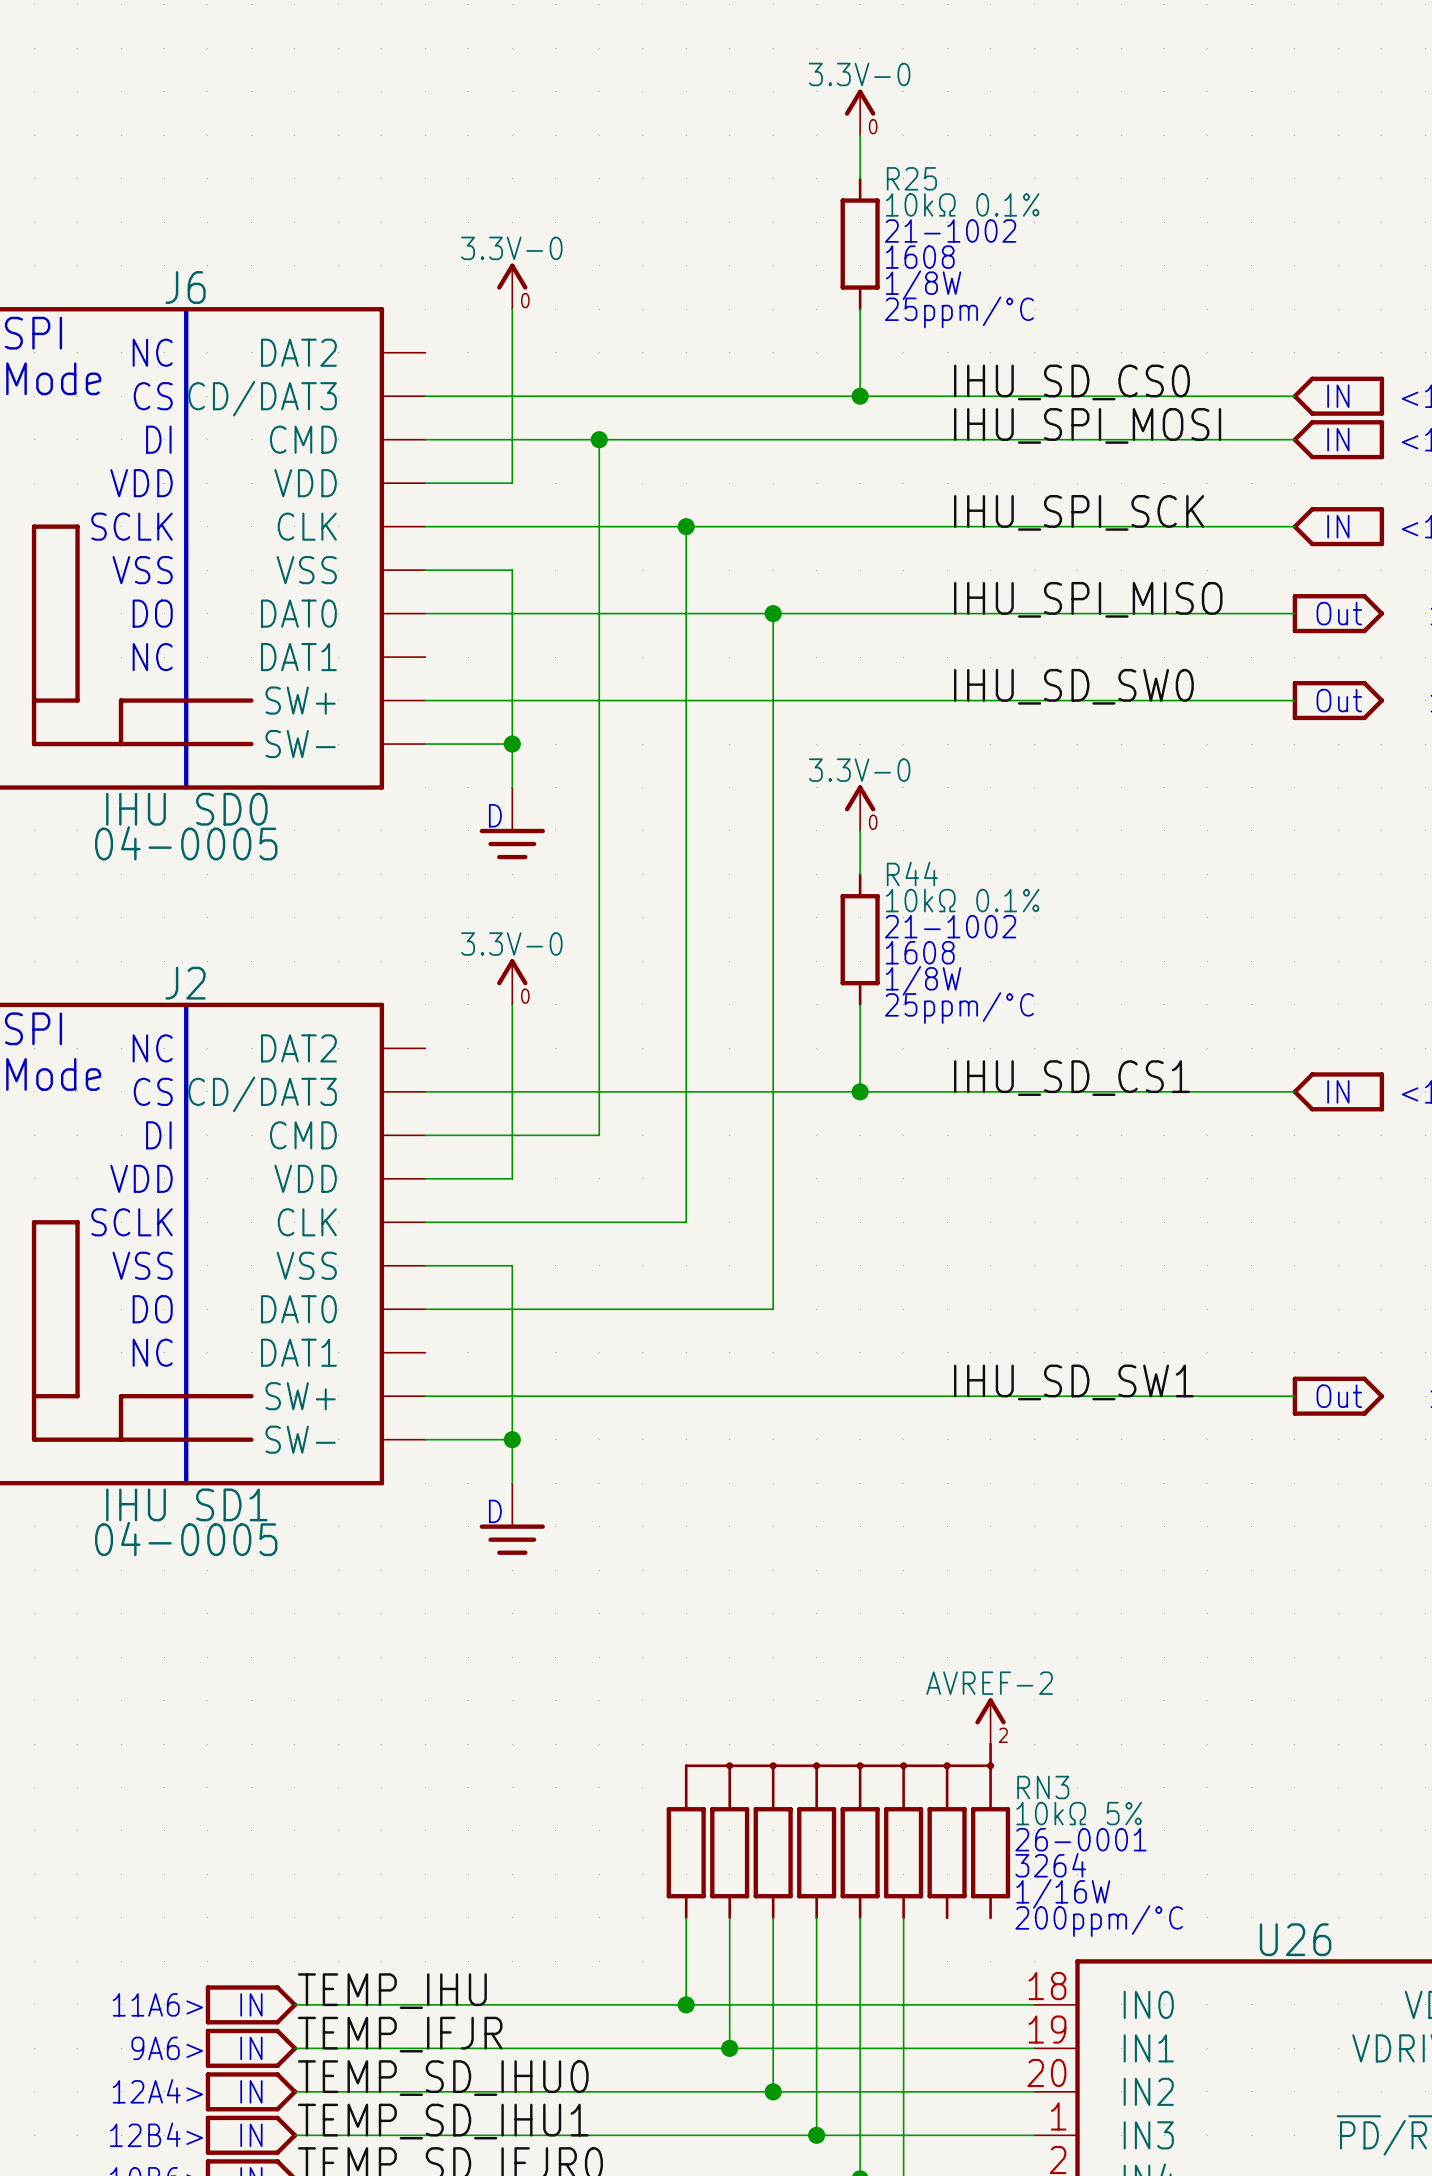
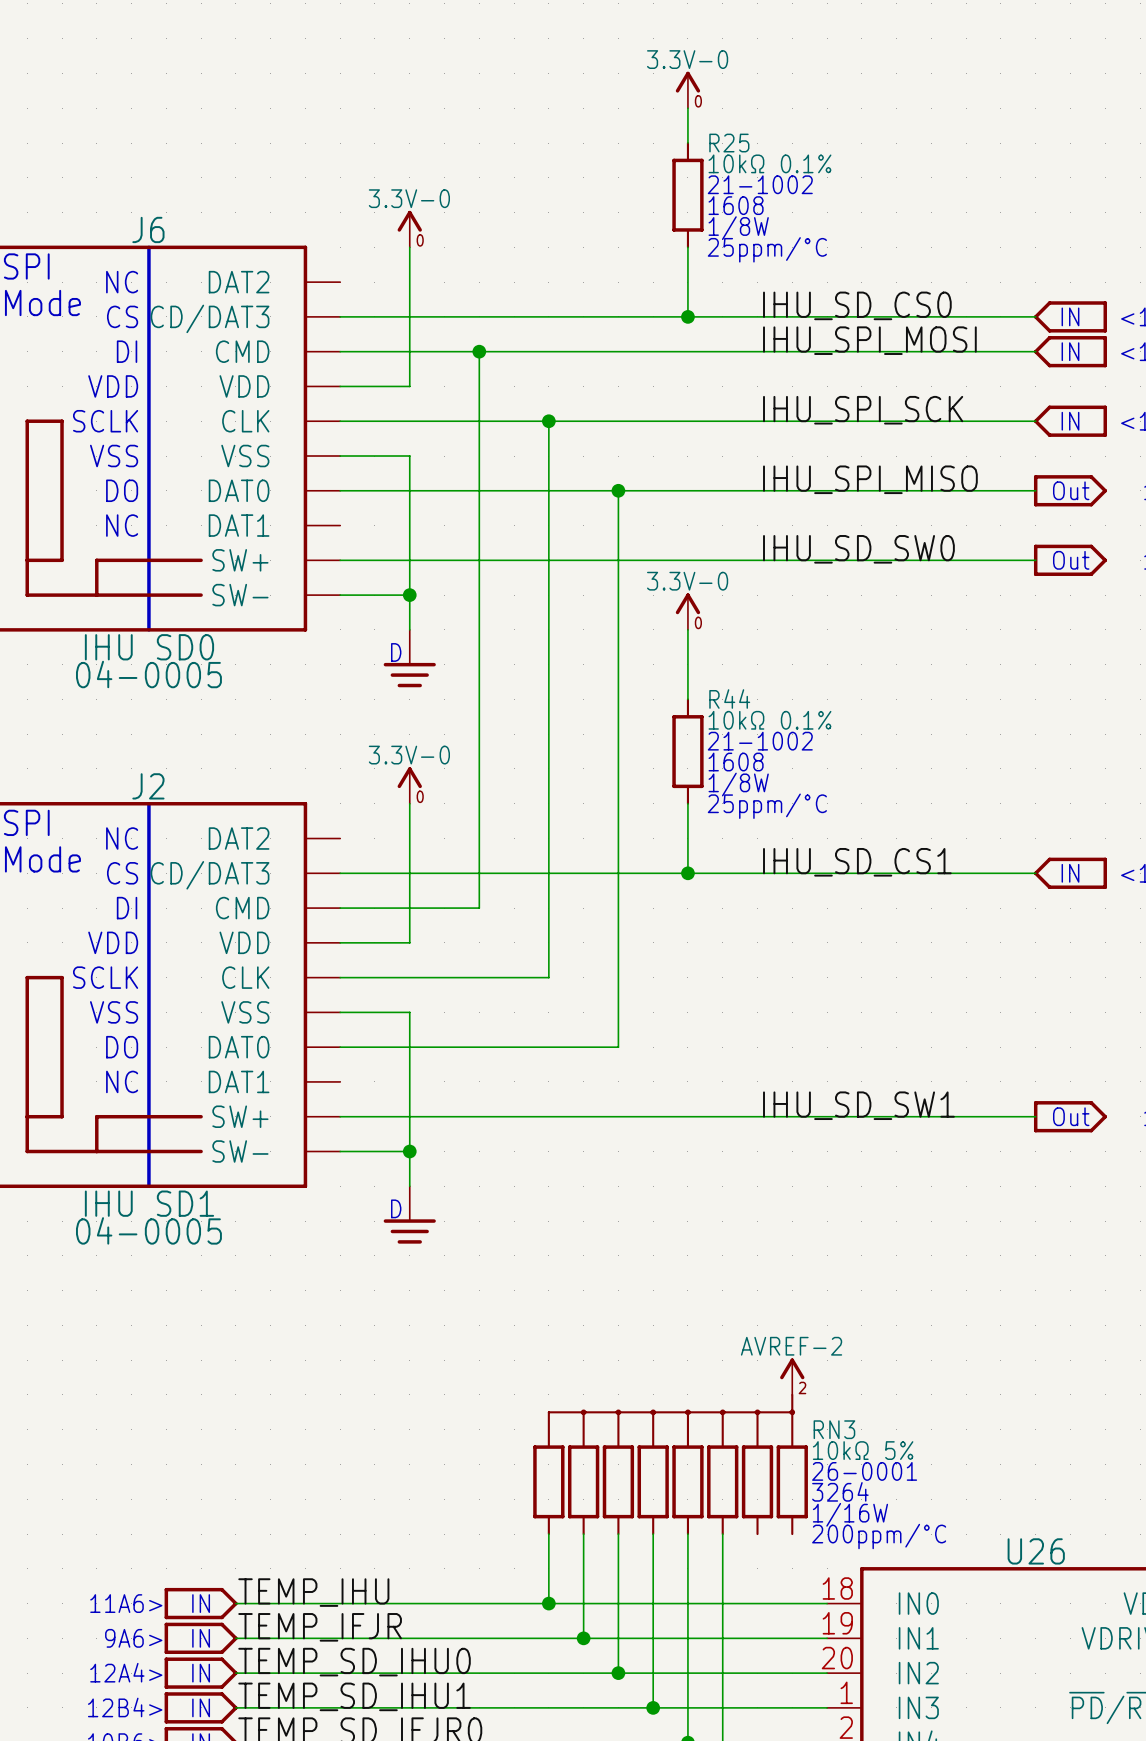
power symbol position: 3.3V-0 (860, 808) -> 3.3V-0 (687, 611)

